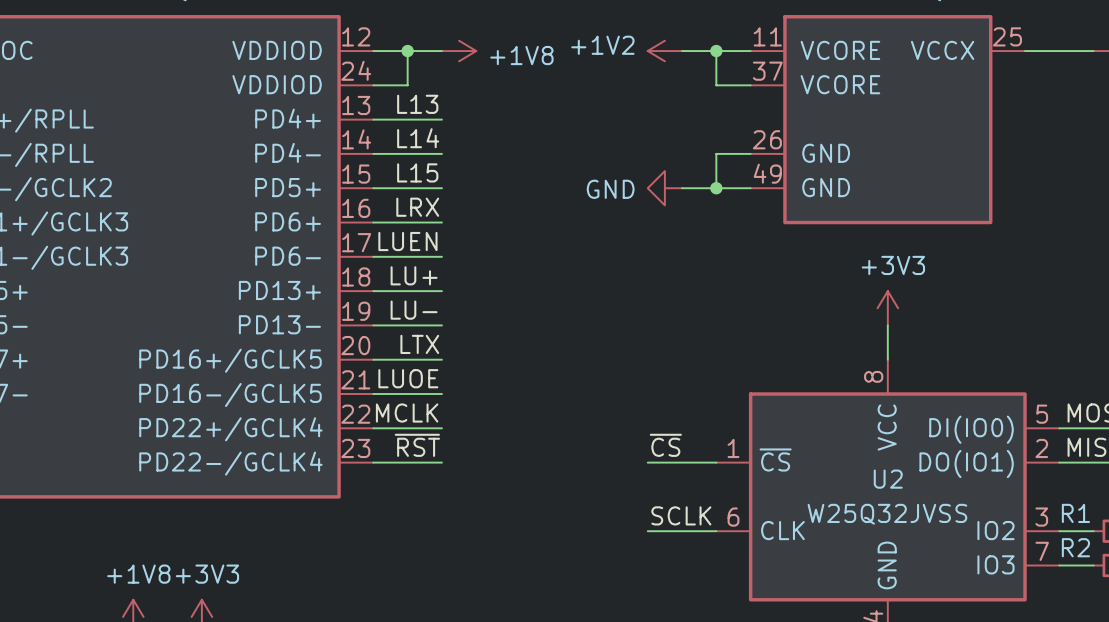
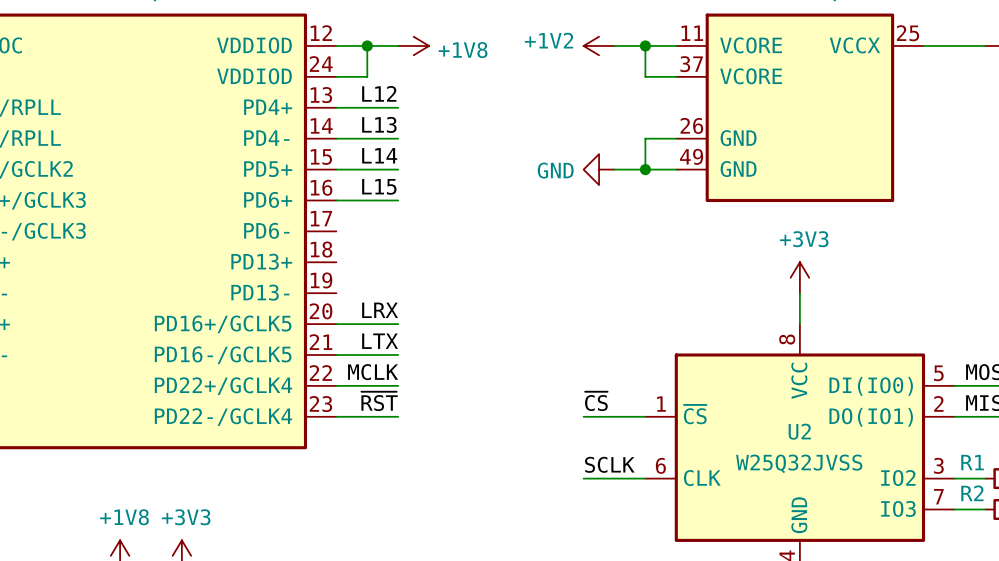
label: L13 (417, 104) -> L12 (379, 93)
label: L14 (418, 138) -> L13 (379, 124)
label: L15 (417, 172) -> L14 (379, 155)
label: LRX (417, 207) -> L15 (379, 186)
label: LUEN (407, 241) -> none
wire: (373, 256) (441, 256) -> none
label: LU+ (414, 275) -> none
wire: (373, 291) (441, 291) -> none
label: LU- (414, 310) -> none
wire: (373, 325) (441, 325) -> none
label: LTX (419, 344) -> LRX (380, 310)
label: LUOE (408, 378) -> LTX (380, 341)

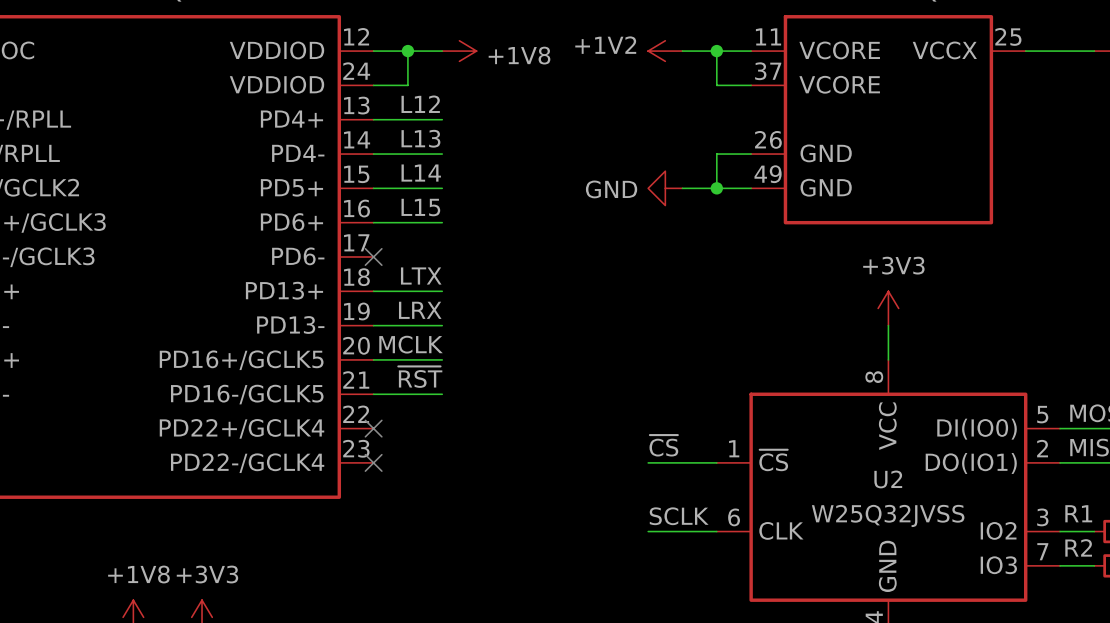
no-connect mark: none -> (373, 256)
label: none -> LTX (421, 276)
label: none -> LRX (420, 310)
label: LRX (380, 310) -> MCLK (411, 344)
label: LTX (380, 341) -> ~{RST} (420, 377)
label: MCLK (373, 372) -> none
wire: (336, 385) (398, 385) -> (373, 325) (442, 325)
no-connect mark: none -> (373, 428)
label: ~{RST} (379, 401) -> none
wire: (336, 416) (398, 416) -> (373, 291) (442, 291)
no-connect mark: none -> (373, 462)

